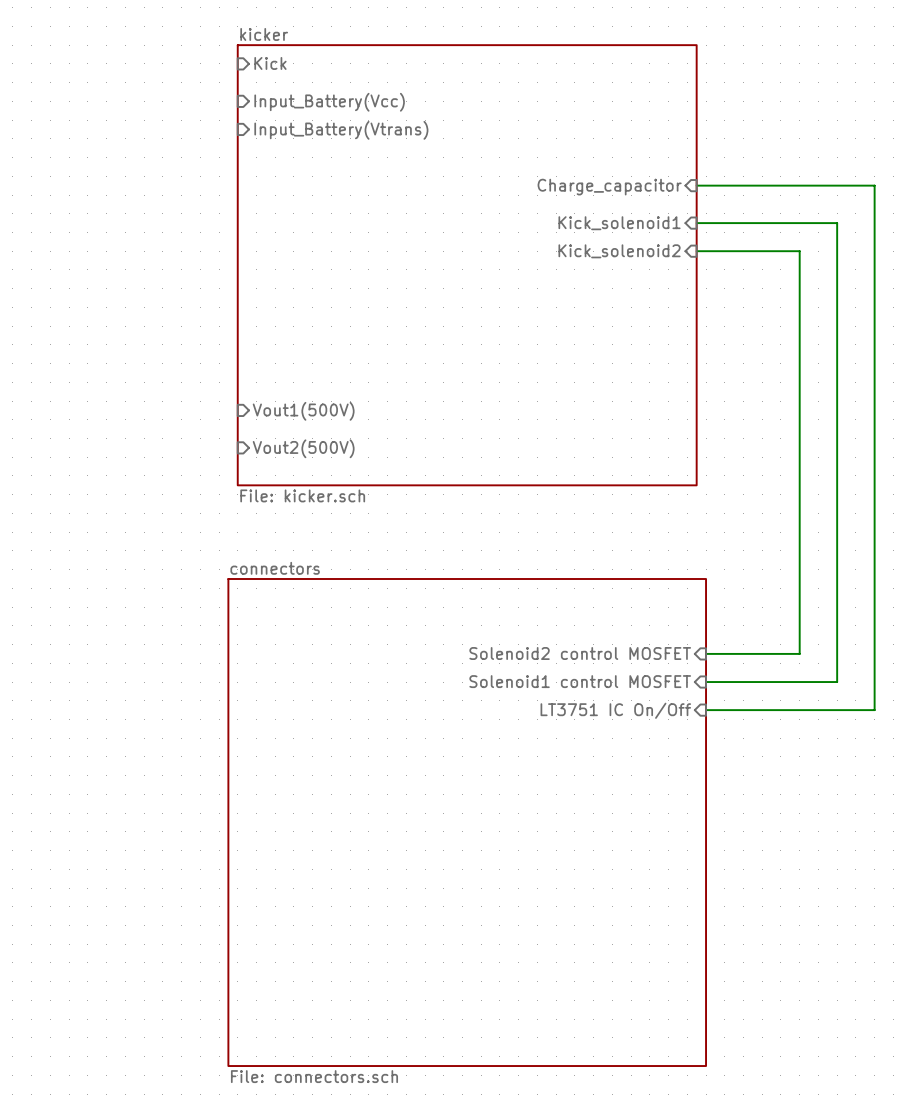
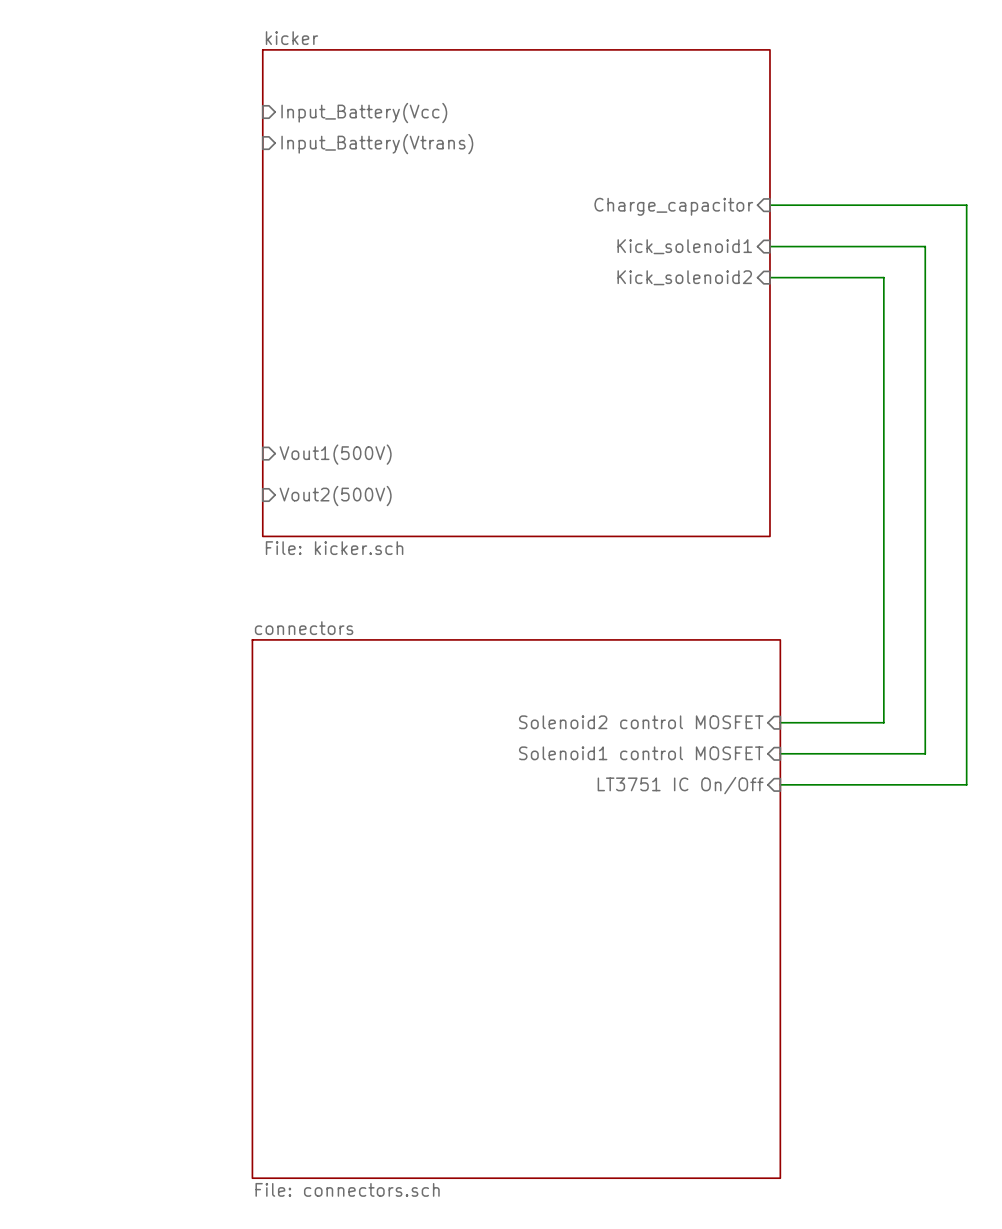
sheet pin: Kick (270, 63) -> none

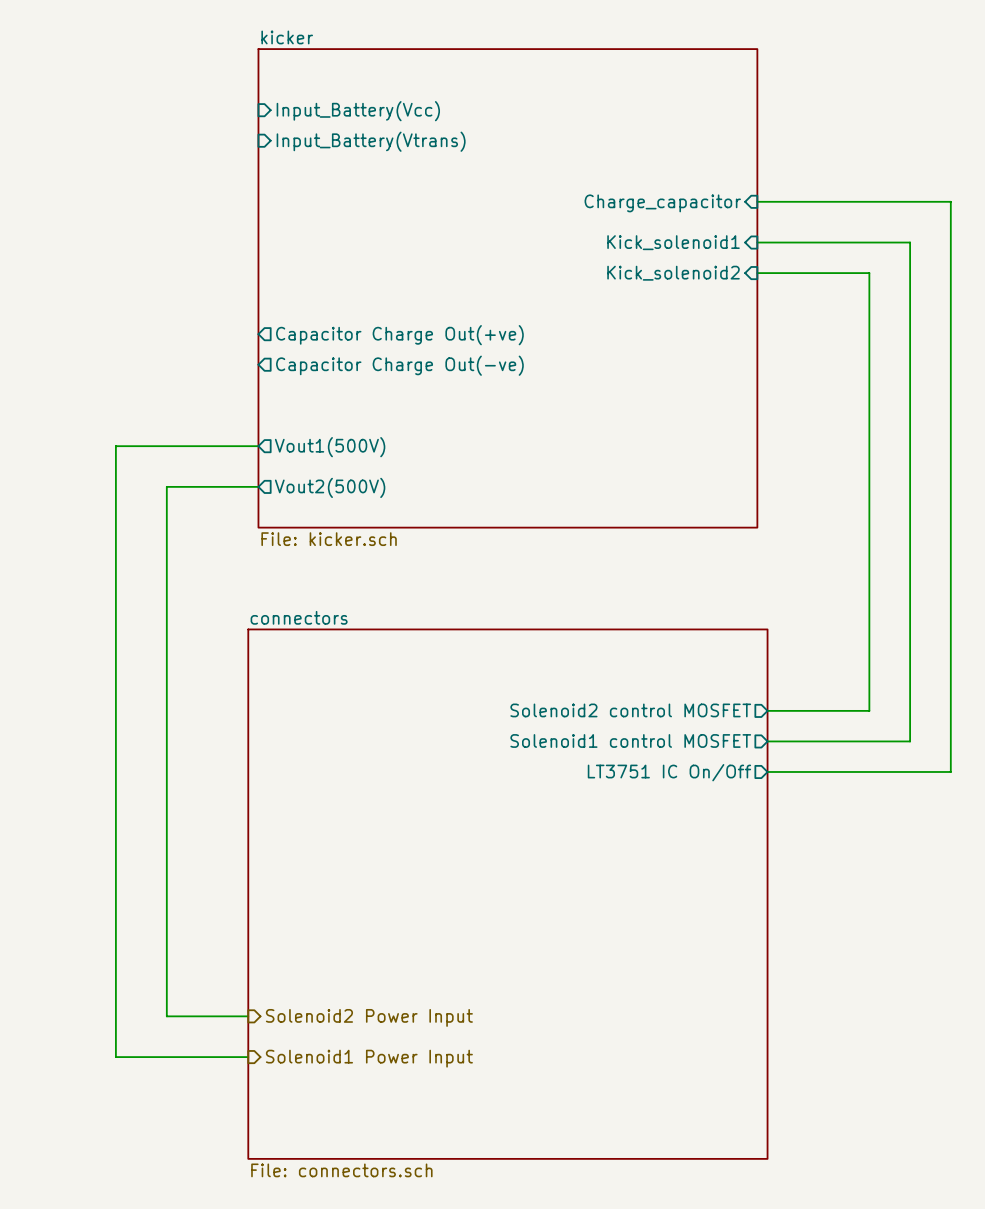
sheet pin: none -> Capacitor Charge Out(+ve) (399, 335)
sheet pin: none -> Capacitor Charge Out(-ve) (399, 365)
wire: none -> (258, 446) (115, 446) (115, 1057) (248, 1057)
sheet pin shape: input (335, 454) -> output (330, 447)
wire: none -> (258, 486) (166, 486) (166, 1016) (248, 1016)
sheet pin shape: input (335, 496) -> output (330, 487)
sheet pin shape: input (641, 722) -> output (630, 710)
sheet pin shape: input (641, 753) -> output (630, 740)
sheet pin shape: input (680, 785) -> output (669, 772)
hierarchical label: none -> Solenoid2 Power Input (369, 1017)
hierarchical label: none -> Solenoid1 Power Input (369, 1058)

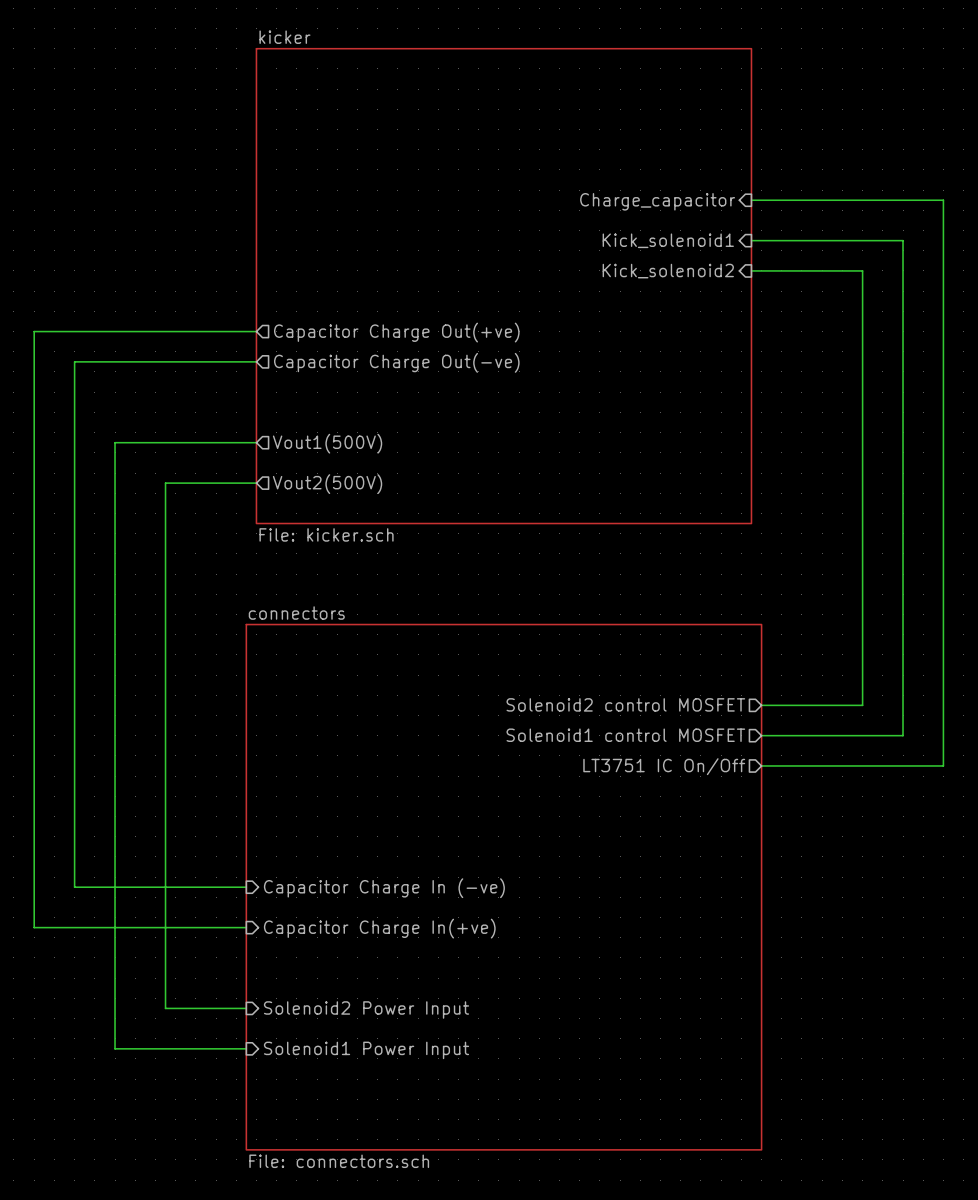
sheet pin: Input_Battery(Vcc) (358, 111) -> none
sheet pin: Input_Battery(Vtrans) (371, 141) -> none
wire: none -> (256, 331) (34, 331) (34, 927) (246, 927)
wire: none -> (256, 361) (74, 361) (74, 887) (246, 887)
hierarchical label: none -> Capacitor Charge In (-ve) (384, 888)
hierarchical label: none -> Capacitor Charge In(+ve) (379, 928)

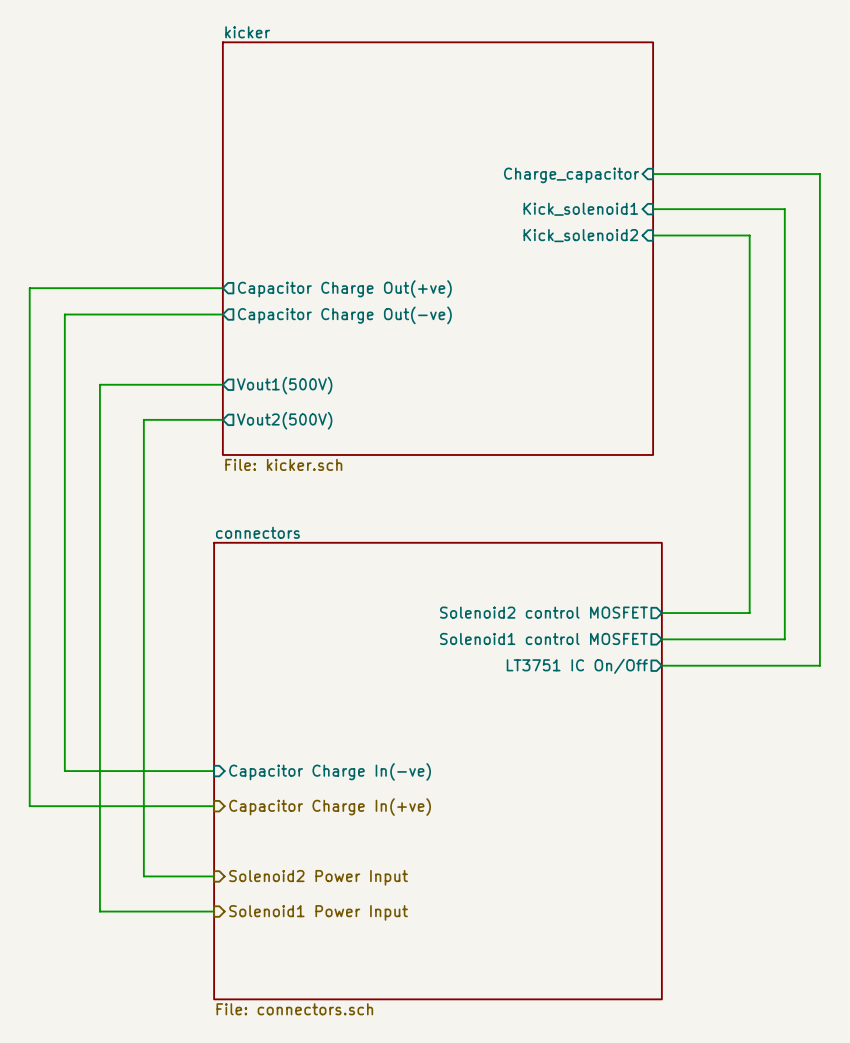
sheet pin: none -> Capacitor Charge In(-ve) (330, 771)
hierarchical label: Capacitor Charge In (-ve) (384, 888) -> none

